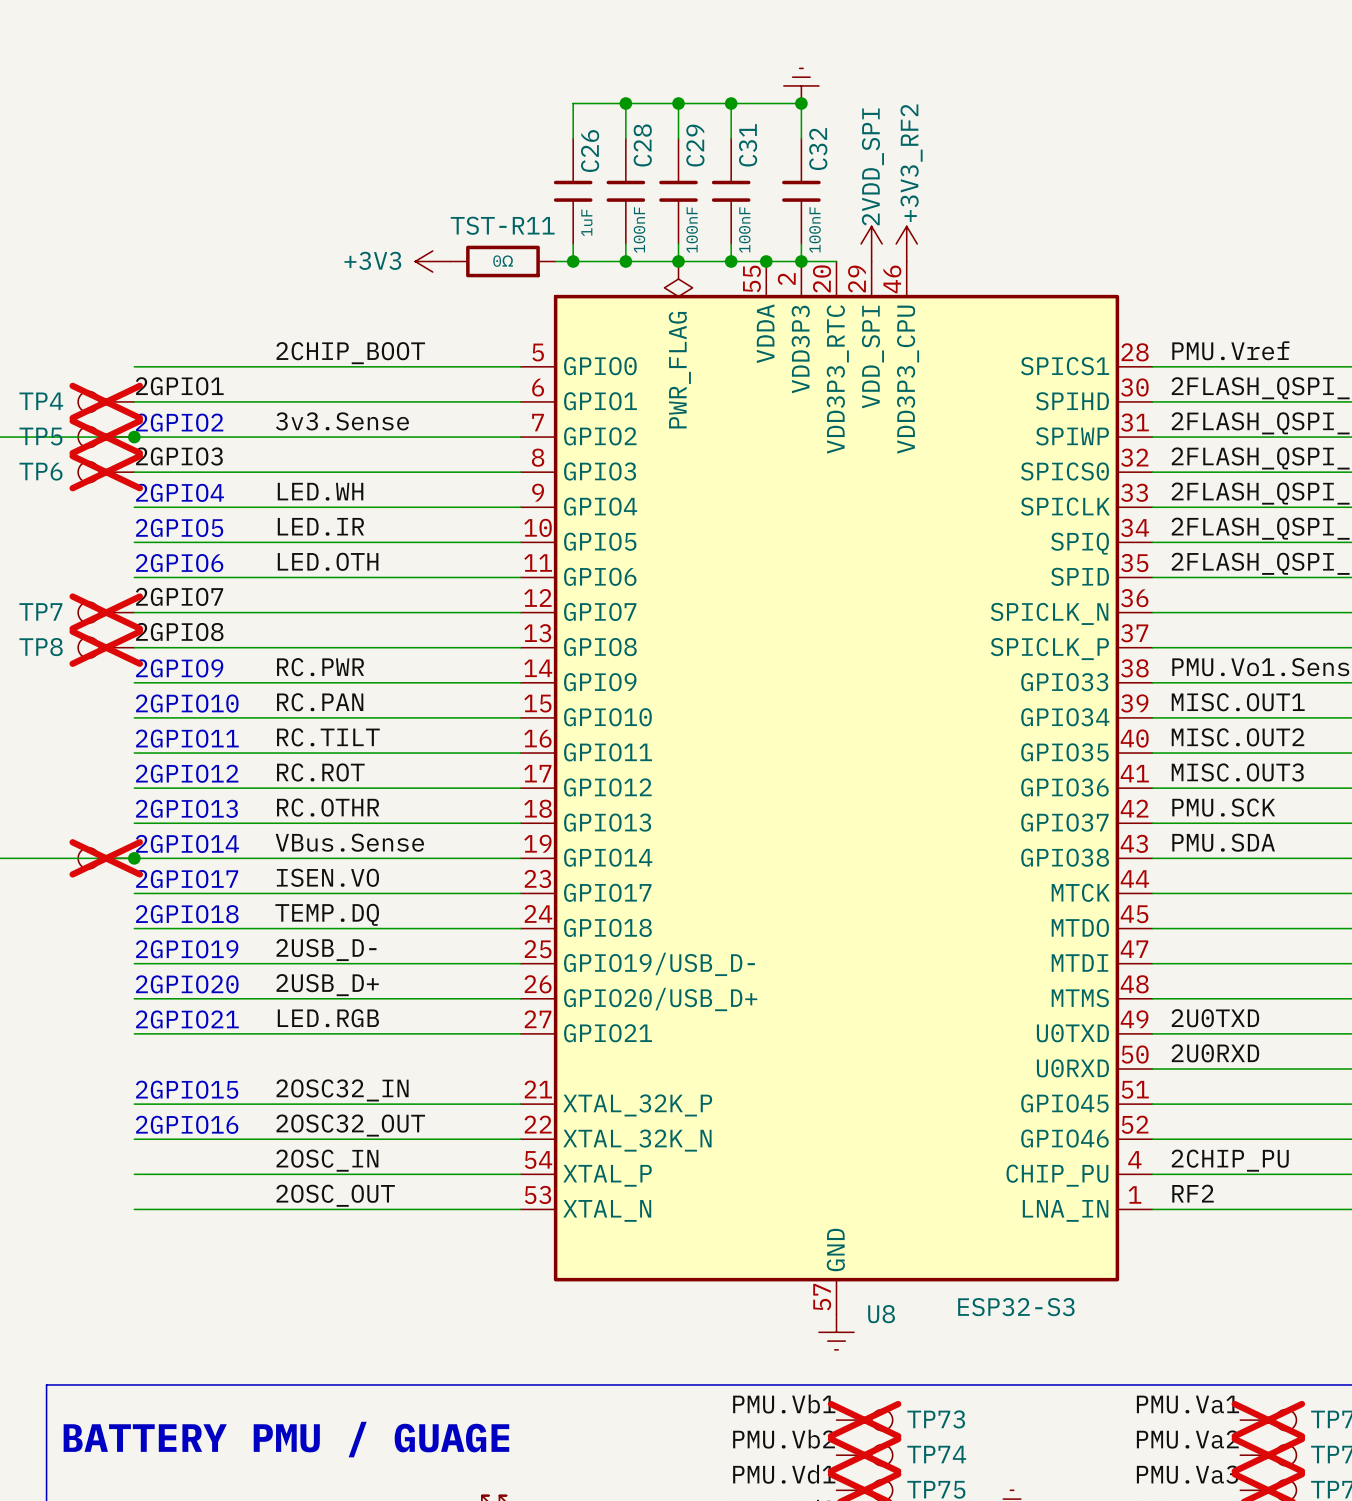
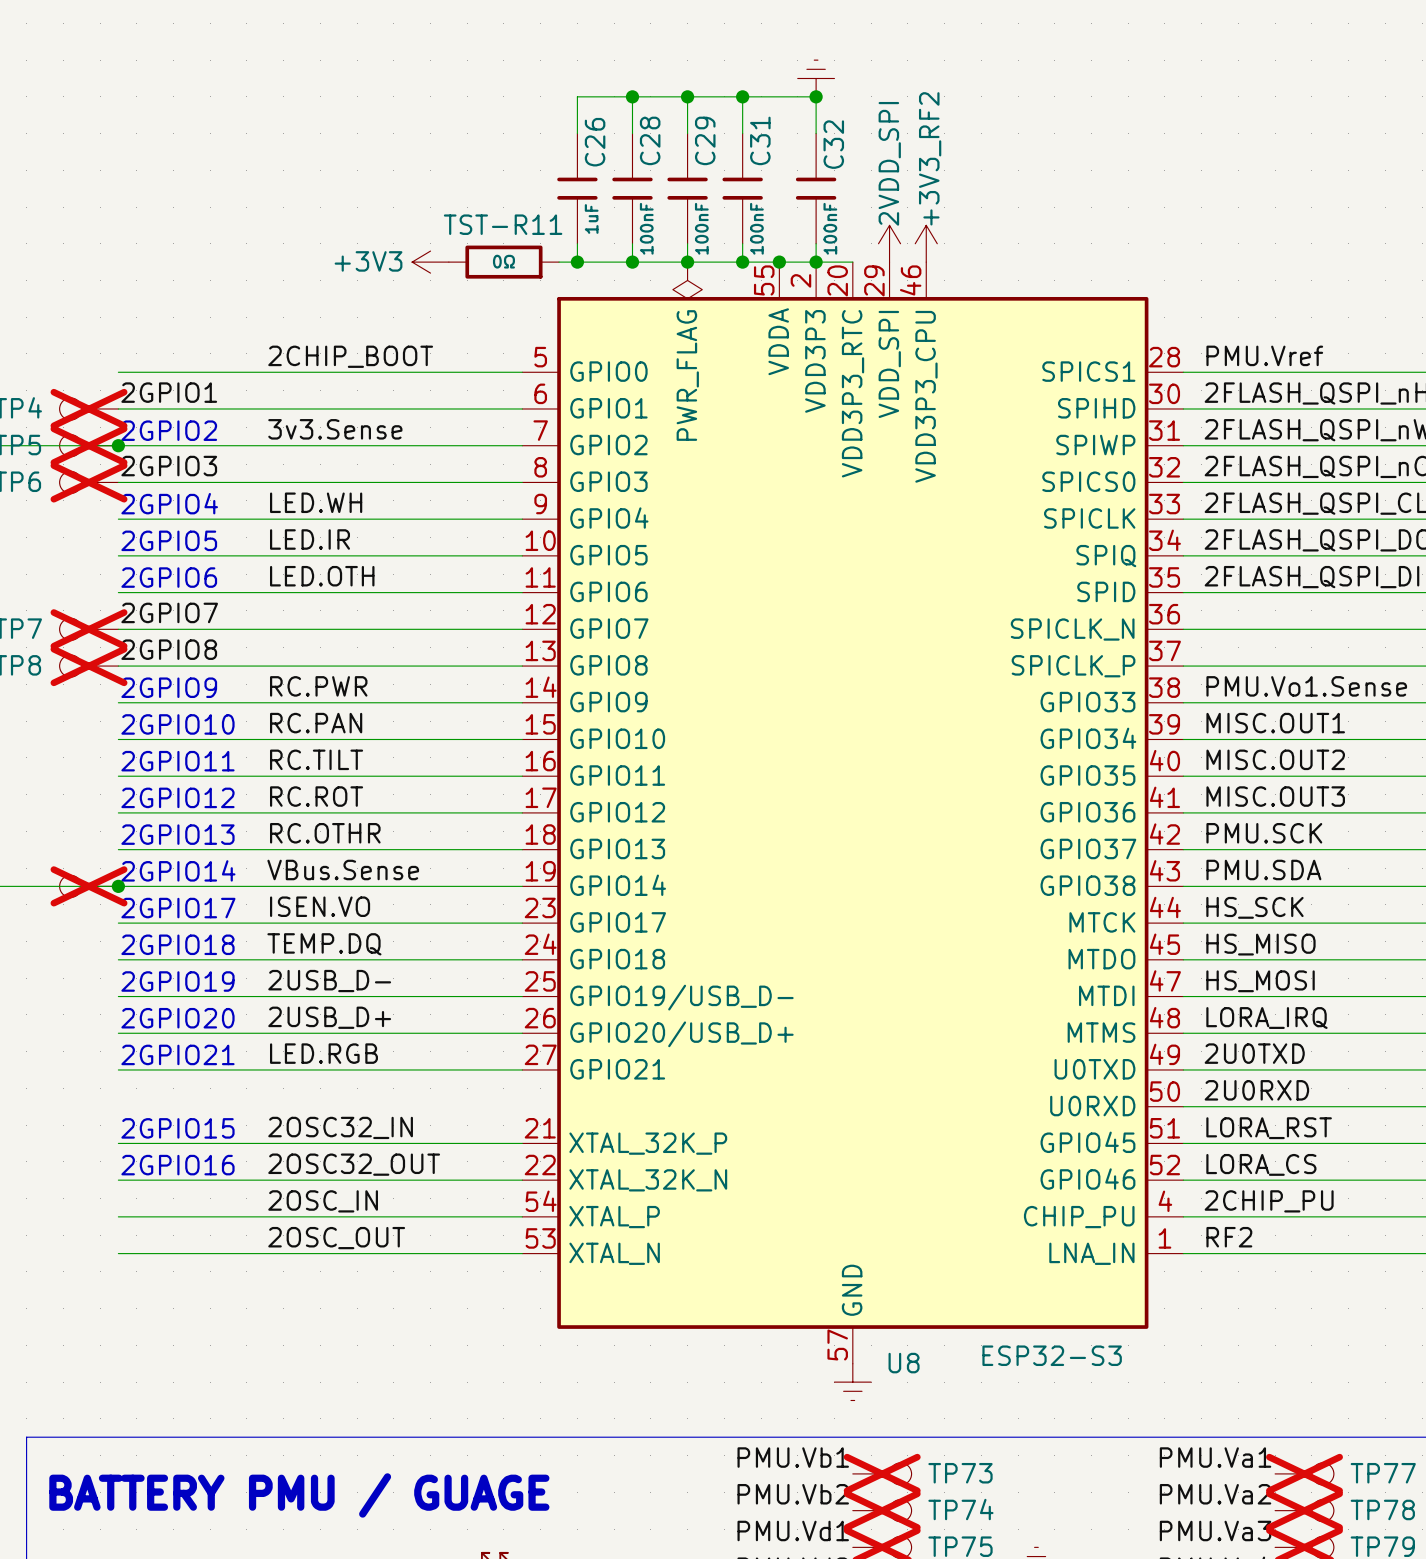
label: none -> HS_SCK (1254, 907)
label: none -> HS_MISO (1260, 944)
label: none -> HS_MOSI (1260, 981)
label: none -> LORA_IRQ (1266, 1018)
label: none -> LORA_RST (1269, 1128)
label: none -> LORA_CS (1261, 1164)

